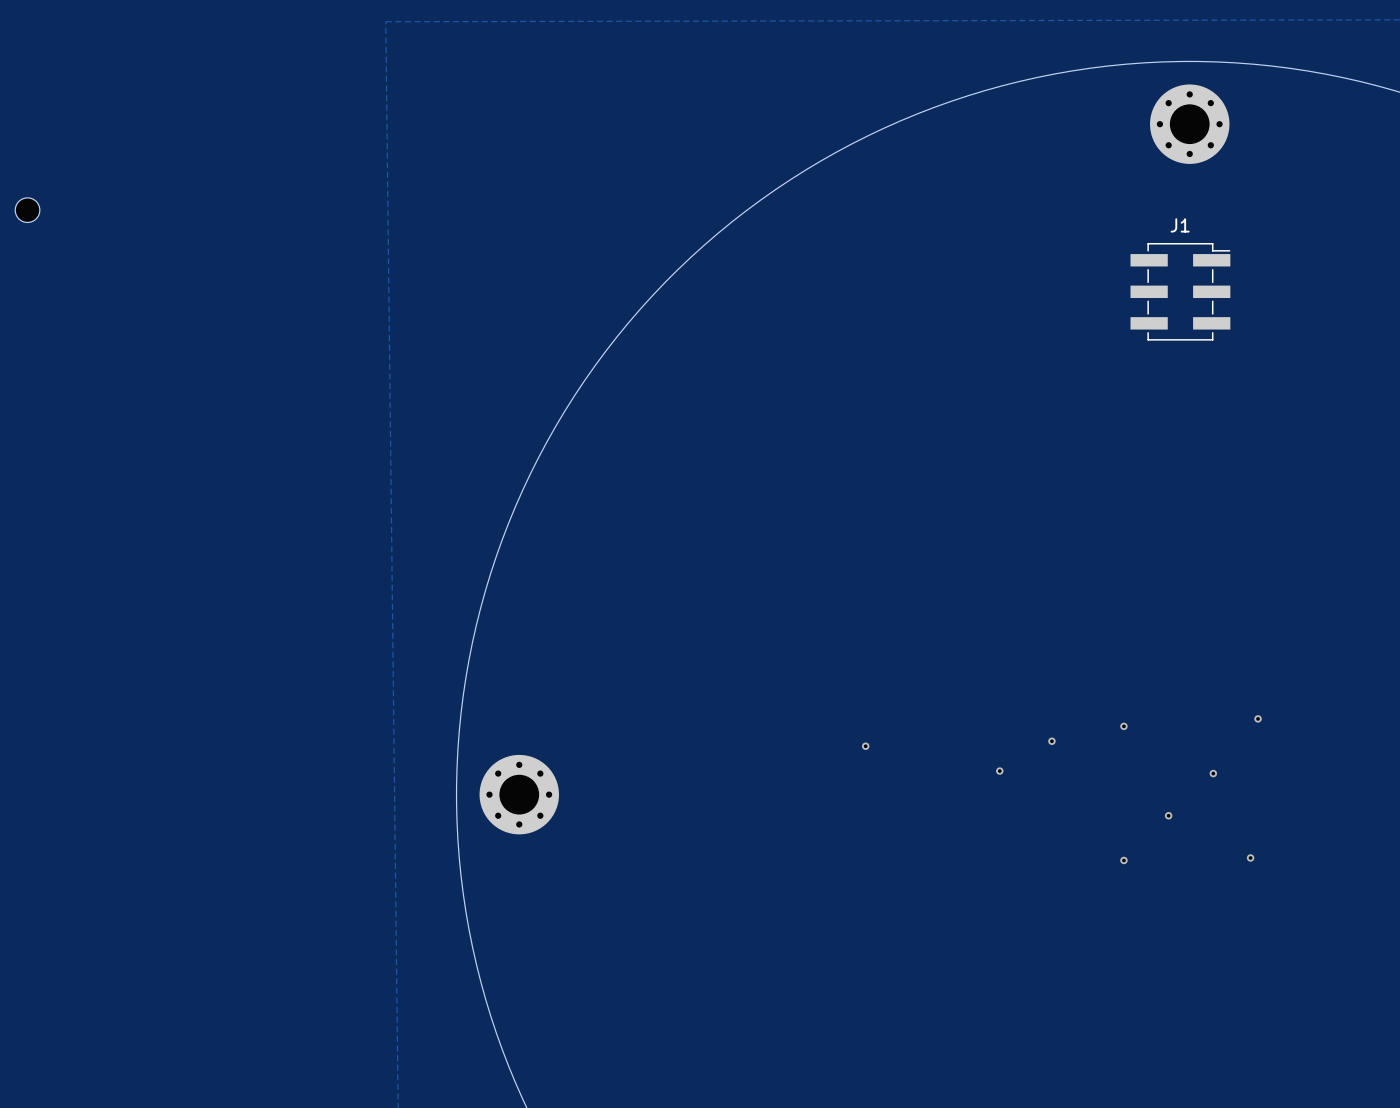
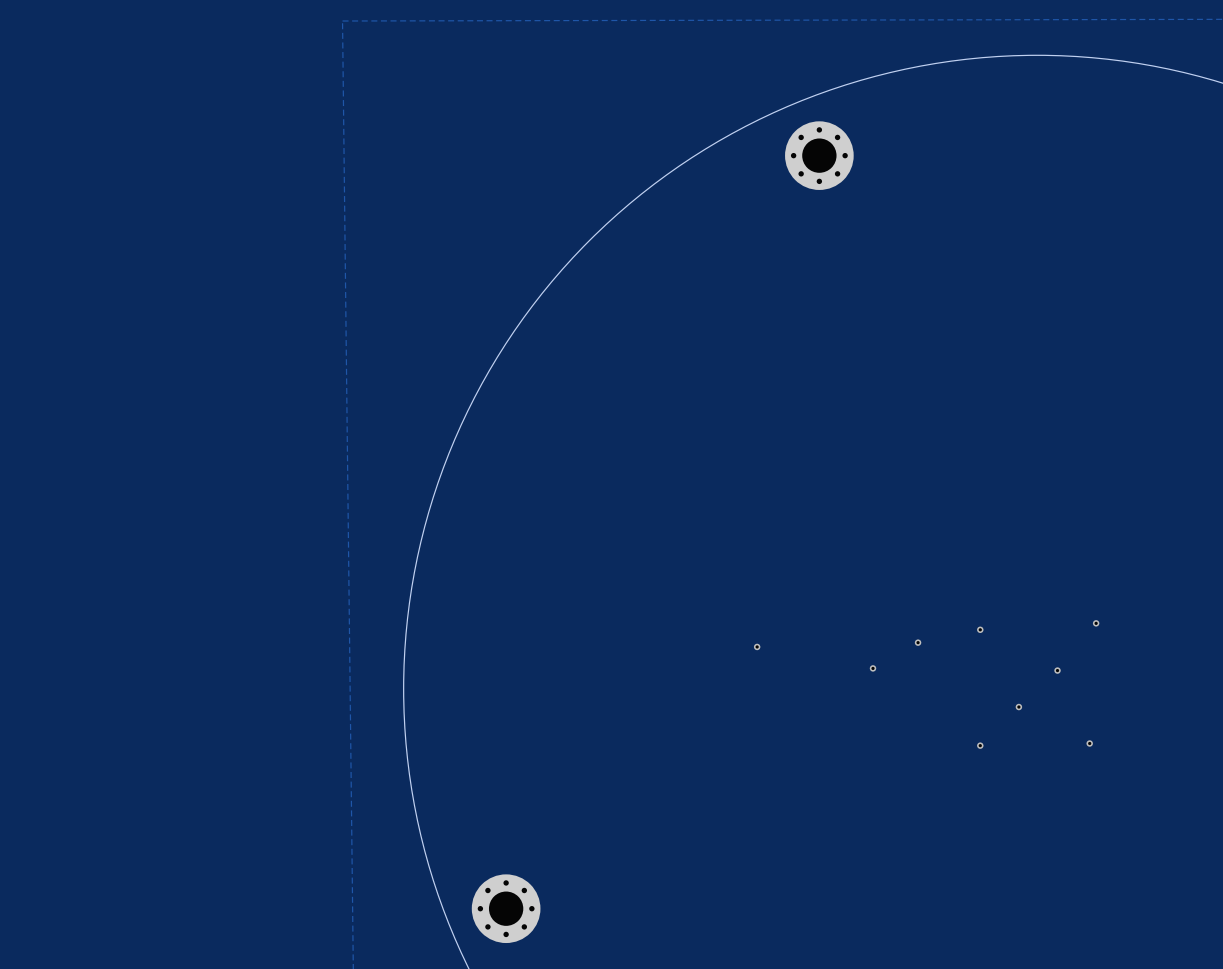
part position: (1189, 124) -> (819, 155)
part: (27, 210) -> none
J1: (1180, 291) -> none
part position: (519, 794) -> (506, 908)

